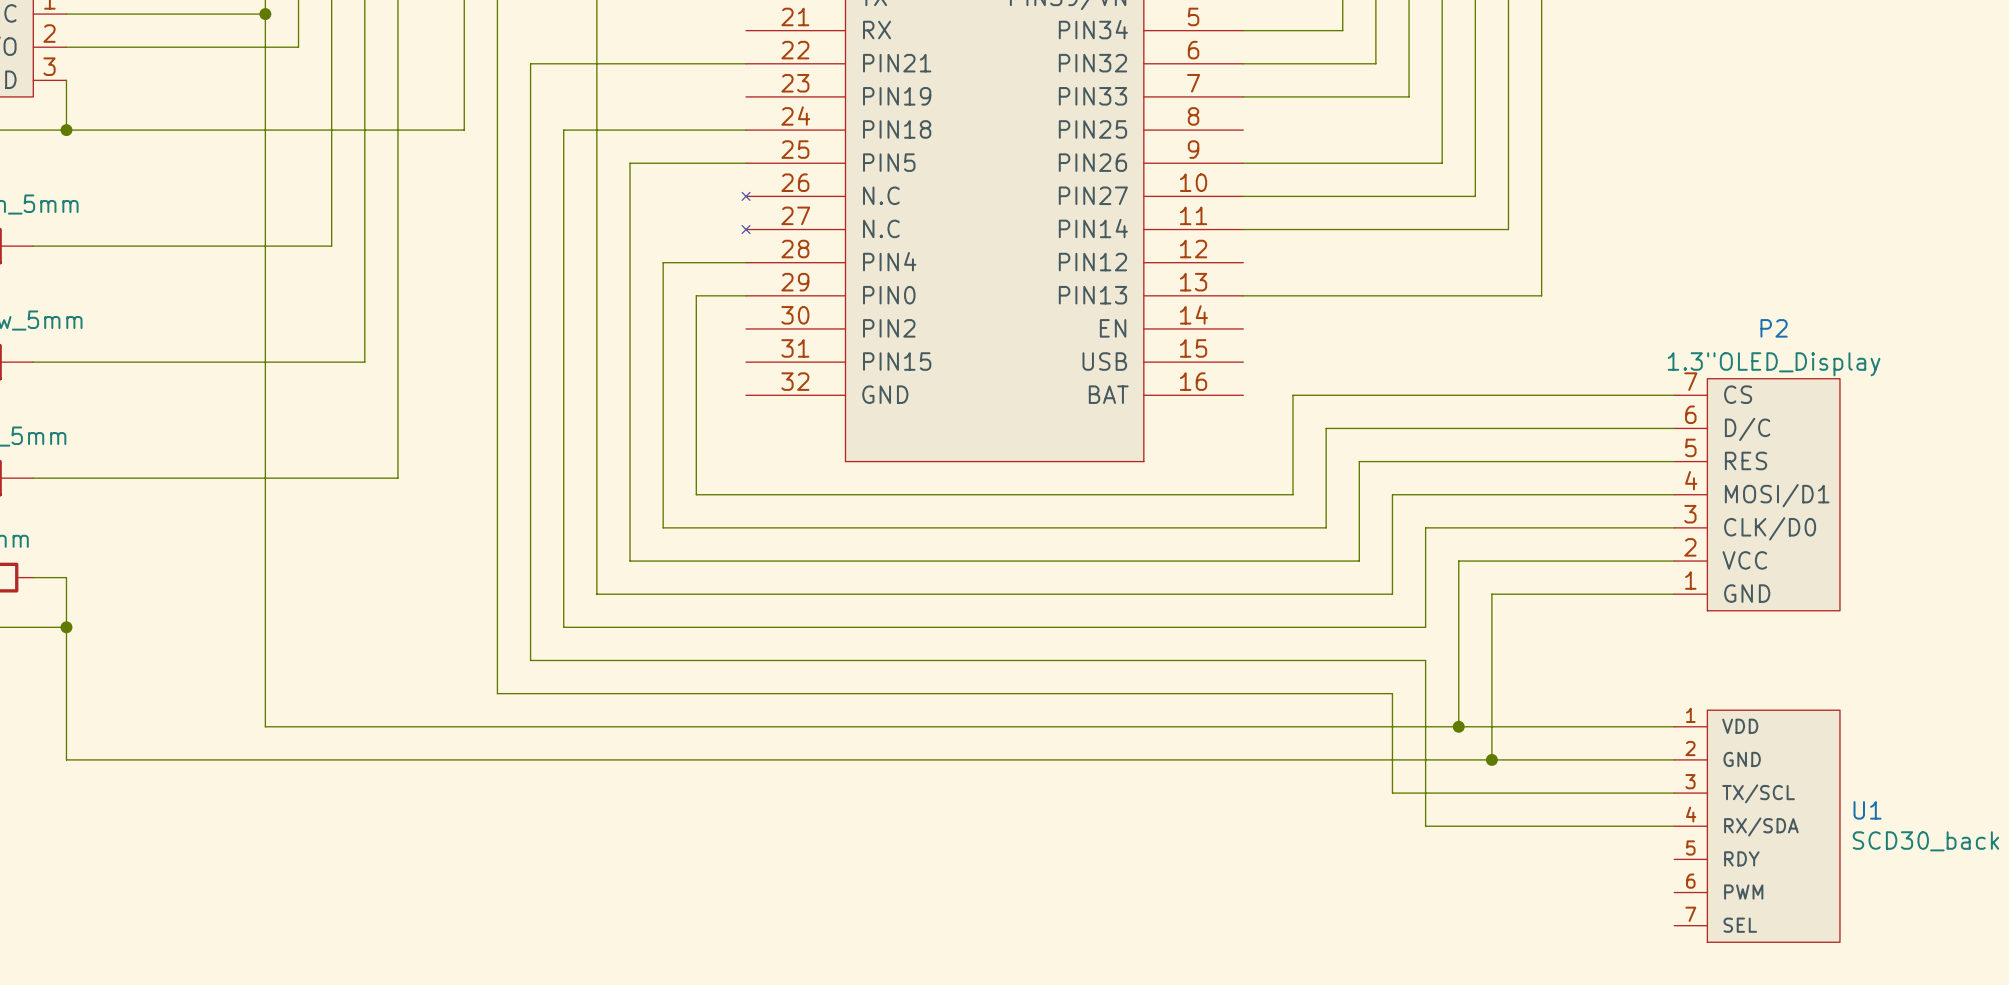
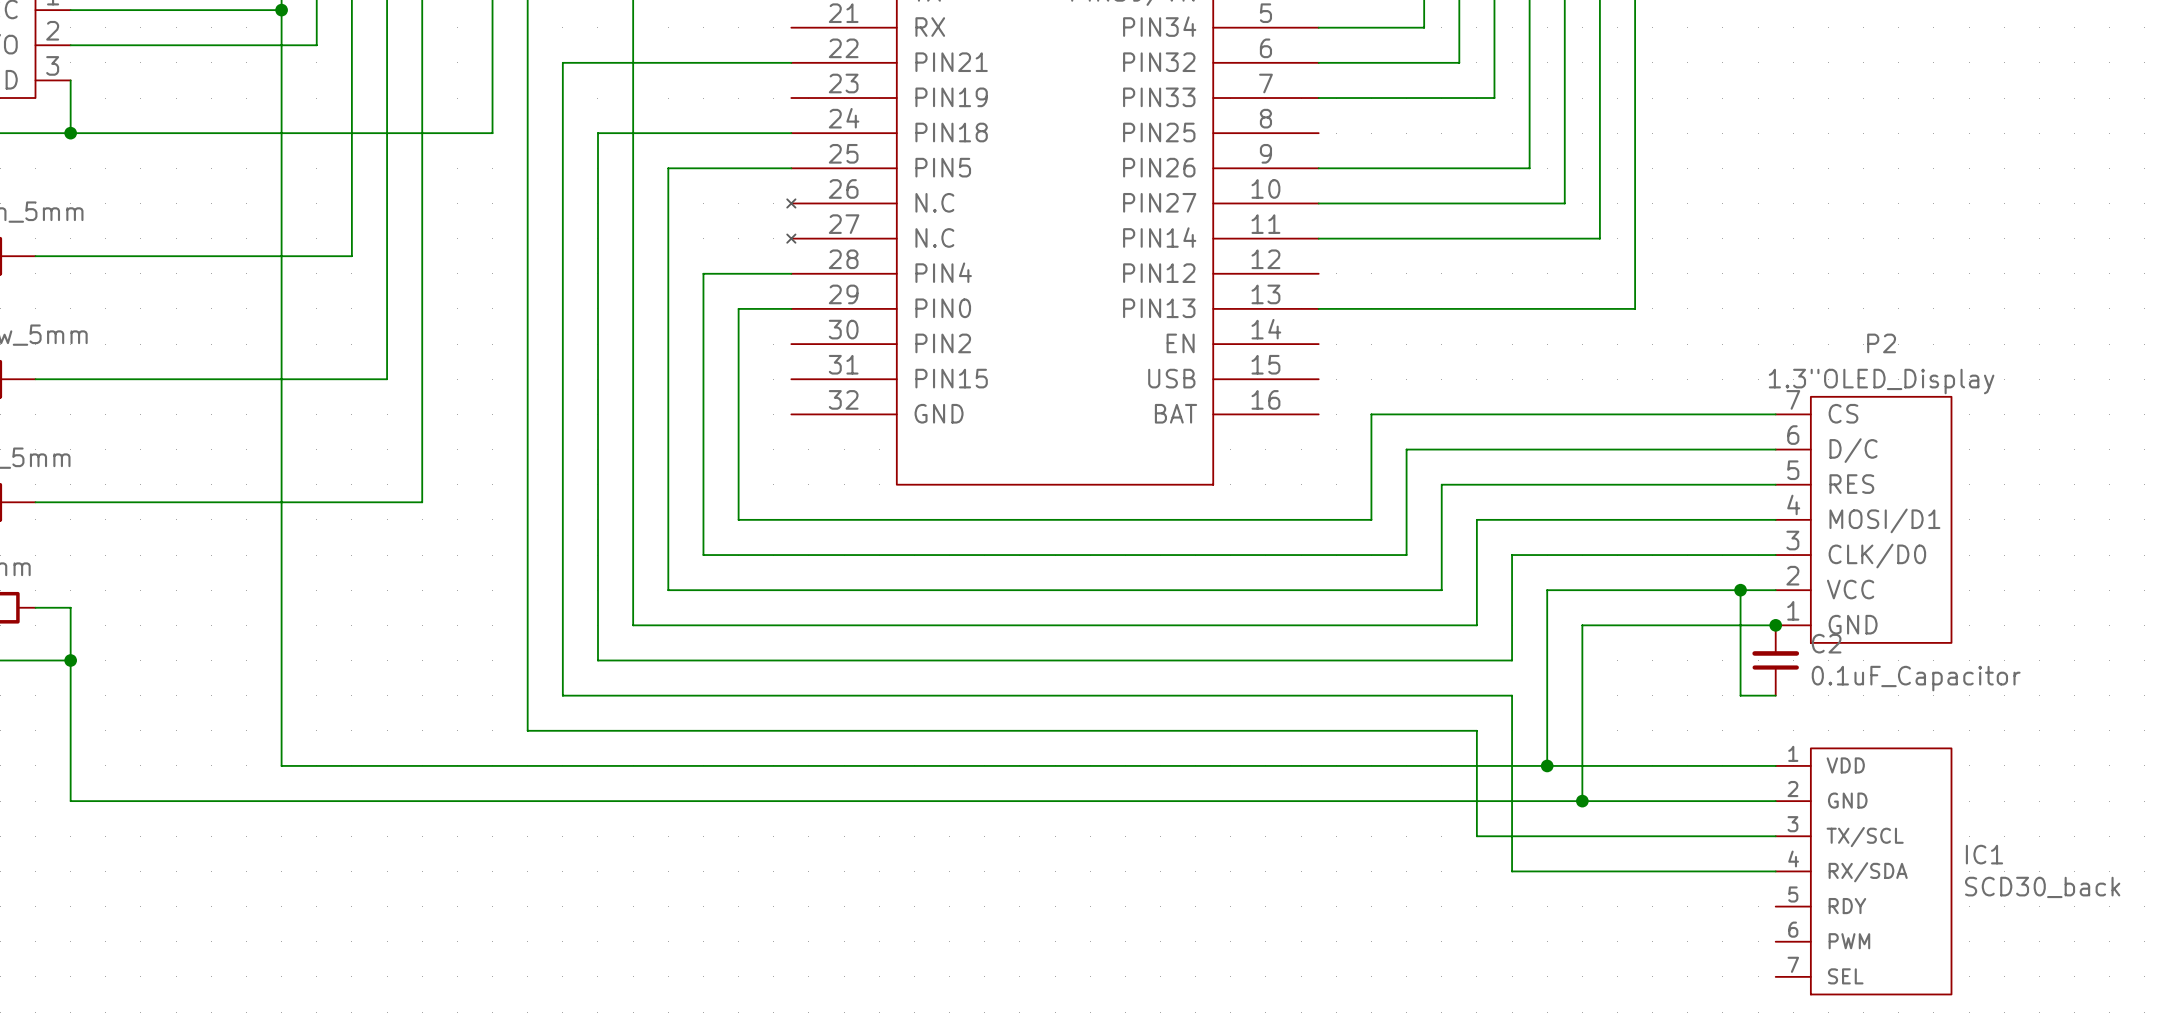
wire: none -> (1740, 590) (1740, 695) (1775, 695)
junction: none -> (1740, 590)
junction: none -> (1775, 625)
C2: none -> 0.1uF_Capacitor (1775, 660)
U1 name: U1 (1867, 810) -> IC1 (1984, 854)

